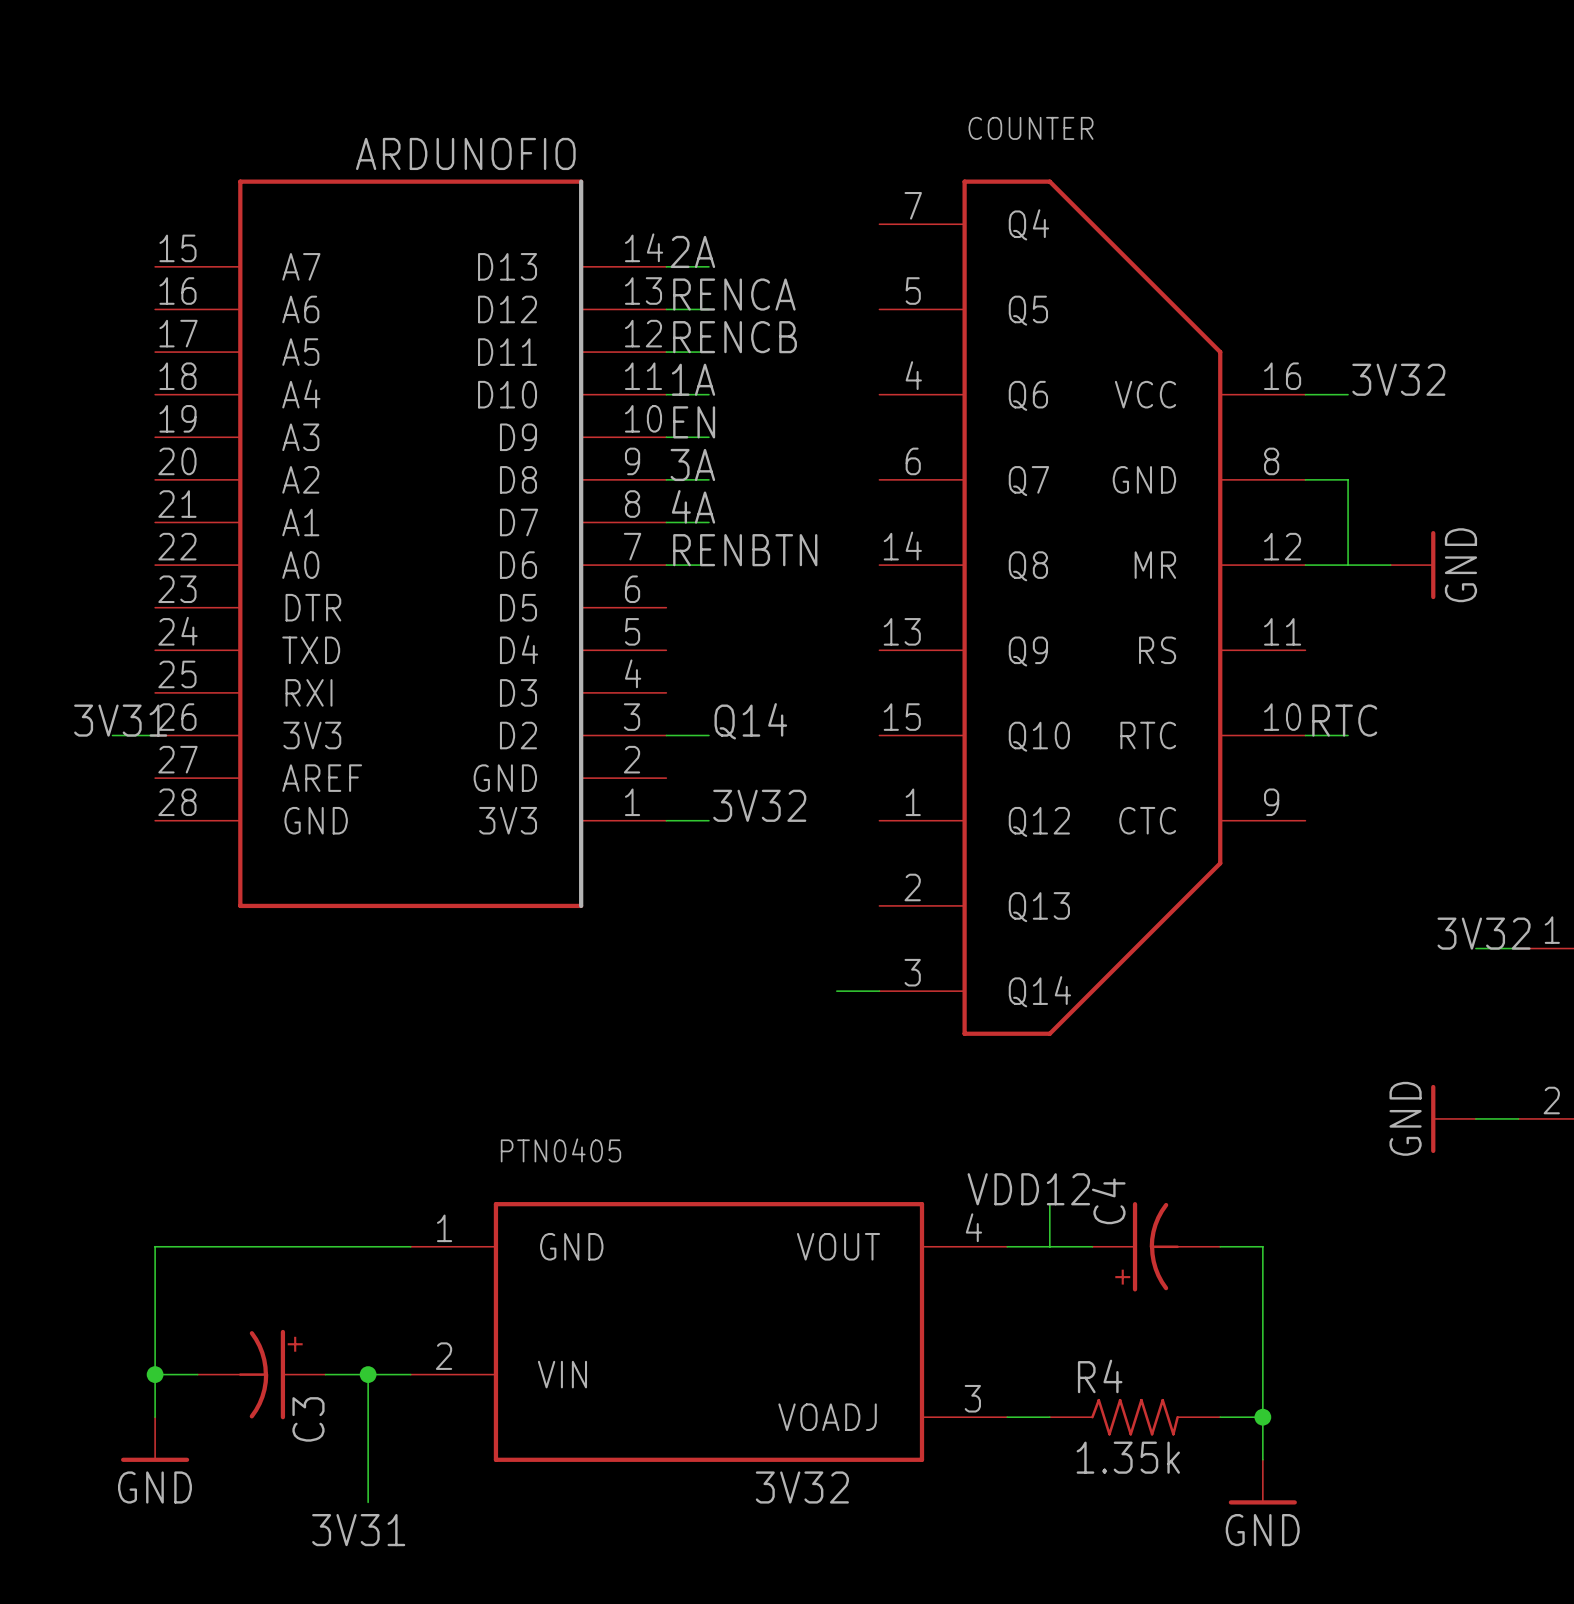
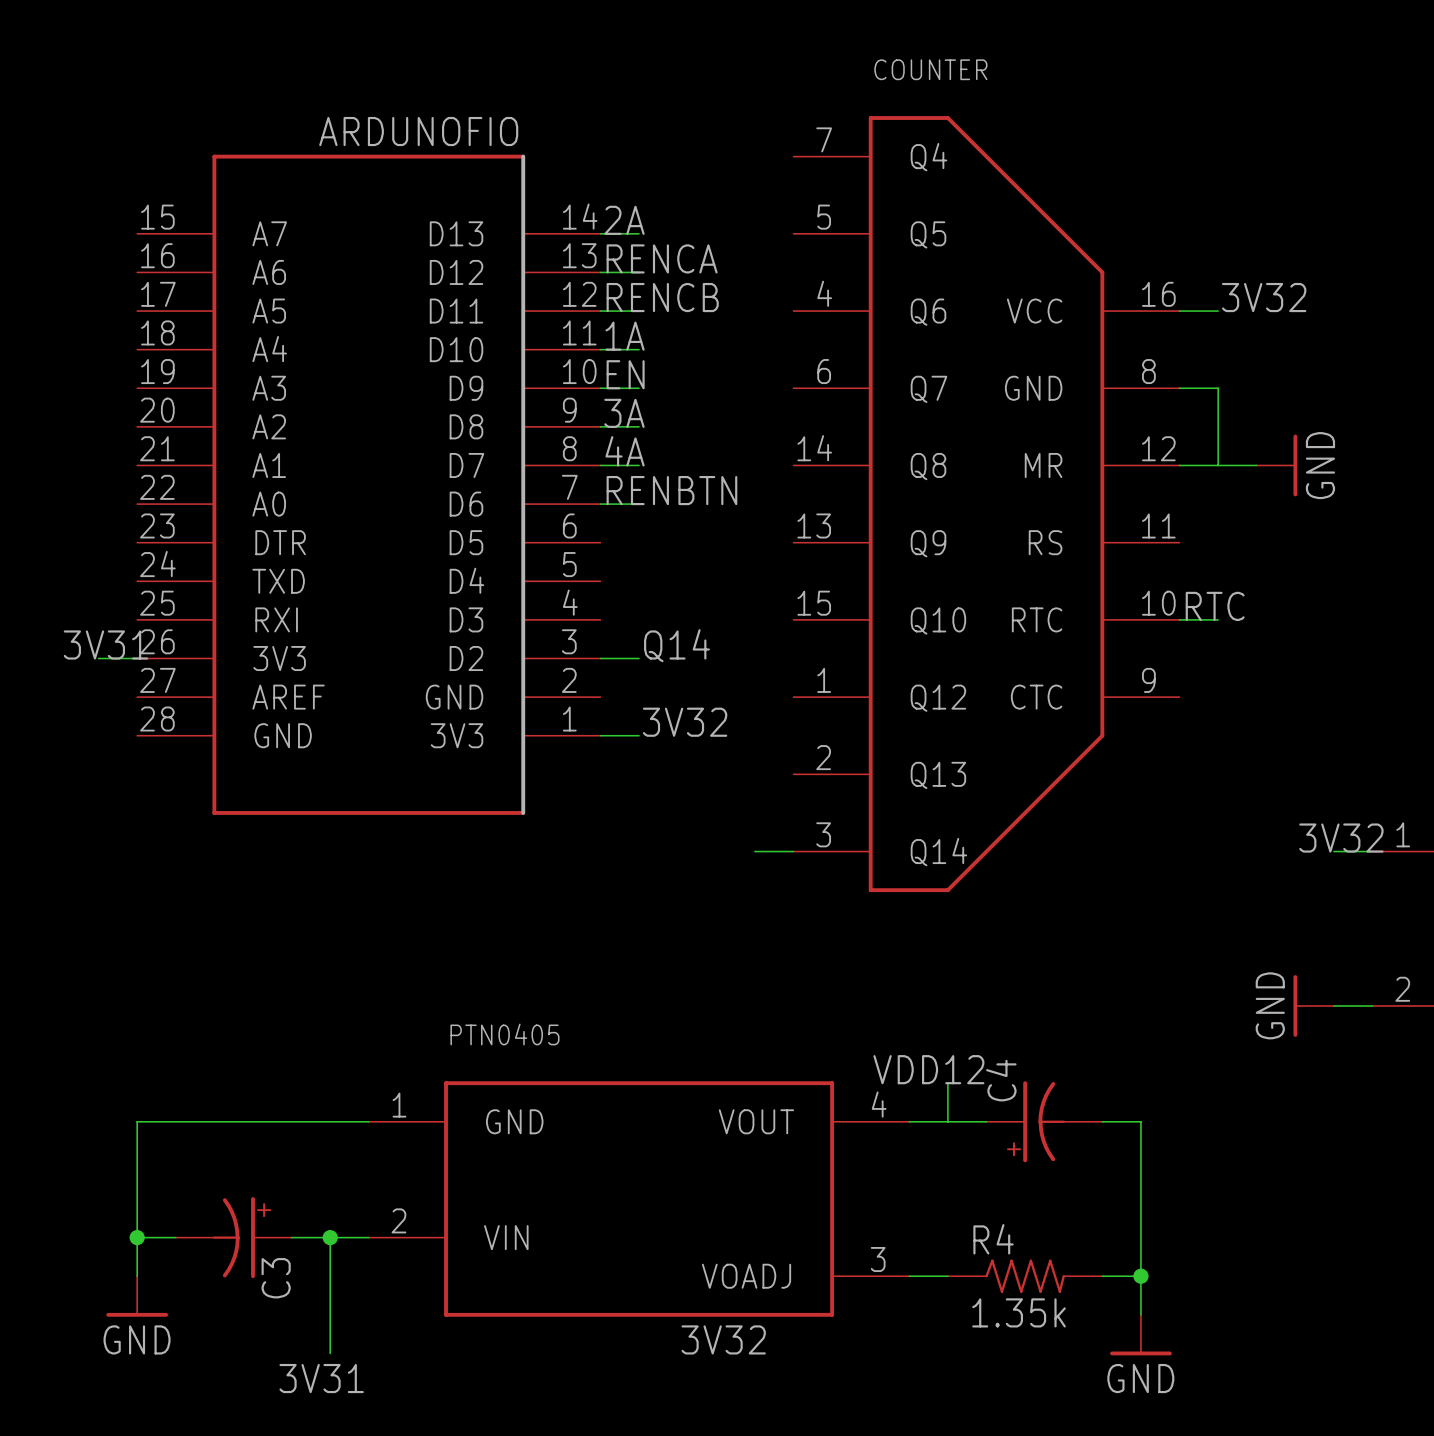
label position: 3V32 (1398, 379) -> 3V32 (1264, 297)
wire: (1305, 394) (1348, 394) -> (1179, 311) (1218, 311)
wire: (1305, 479) (1348, 479) -> (1179, 388) (1218, 388) (1218, 426)
wire: (1348, 522) (1348, 565) -> none
wire: (1305, 565) (1390, 565) -> (1179, 465) (1256, 465)
power symbol position: GND (1413, 565) -> GND (1277, 465)
COUNTER position: (1092, 607) -> (986, 504)
label position: RTC (1344, 720) -> RTC (1215, 606)
wire: (1305, 735) (1348, 735) -> (1179, 619) (1218, 619)
wire: (836, 991) (879, 991) -> (754, 851) (793, 851)

